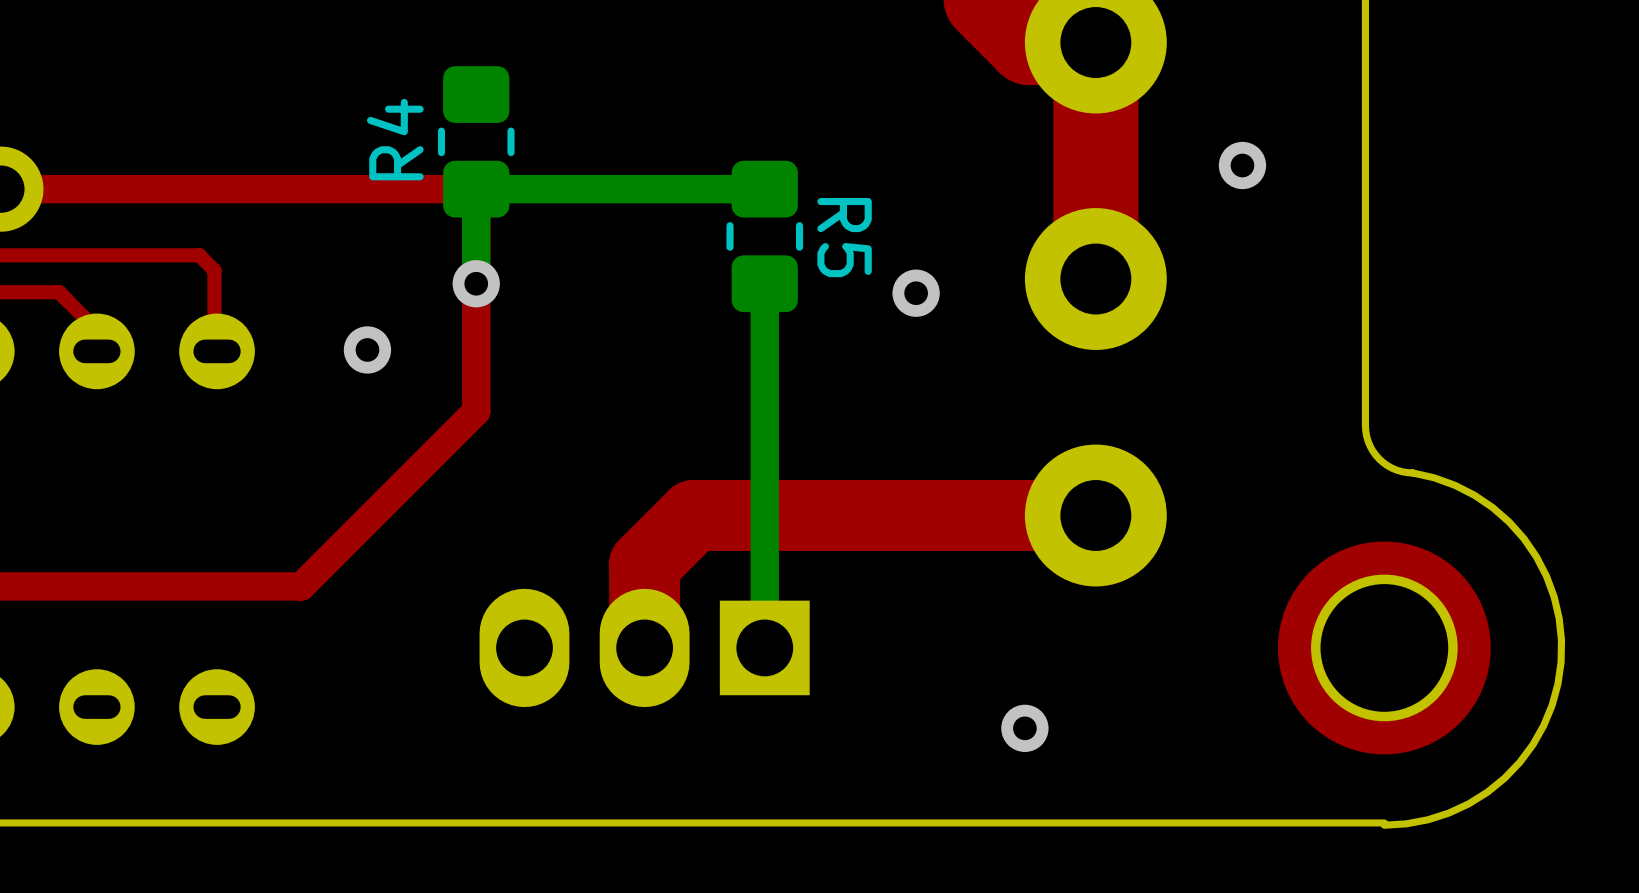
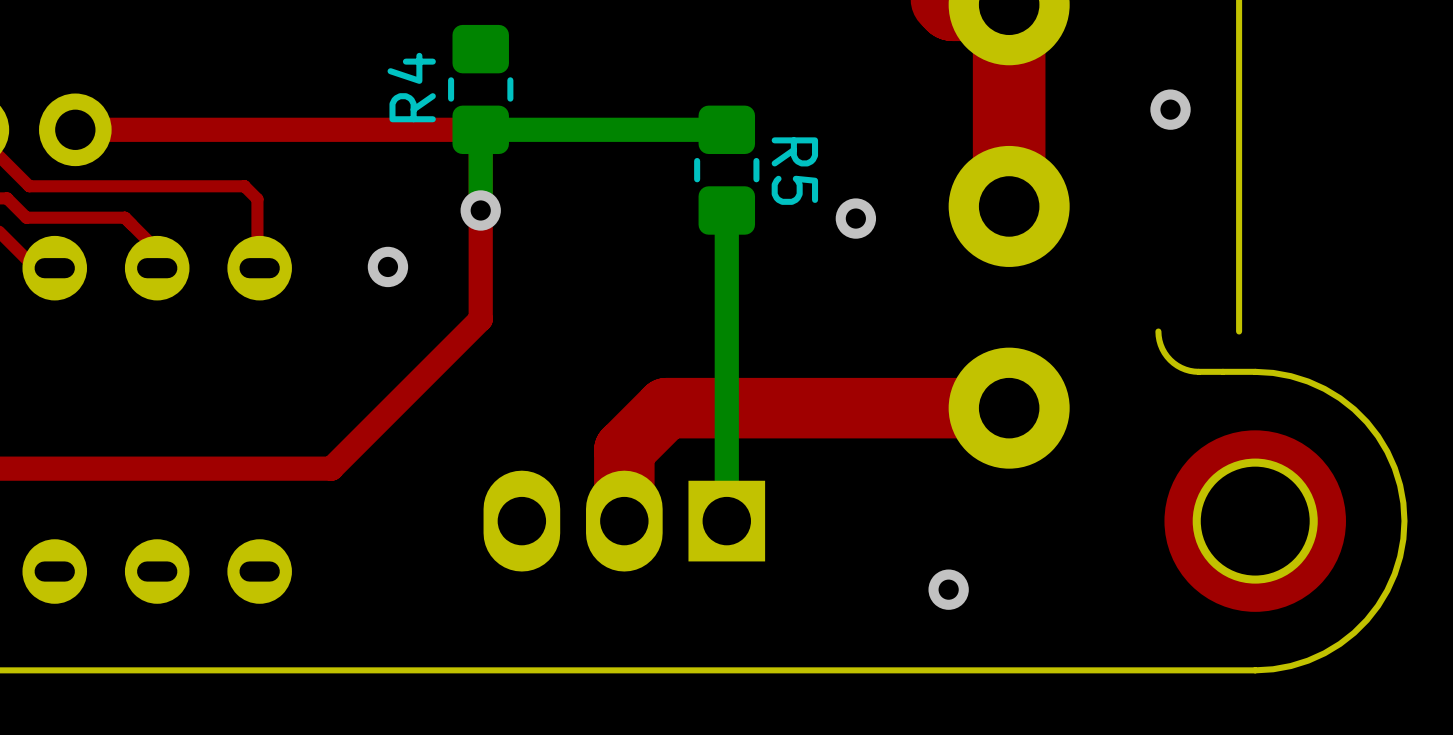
via position: (1242, 165) -> (1170, 109)
board edge: none -> (1158, 331) (1159, 340) (1164, 352) (1173, 363) (1185, 369) (1198, 371) (1273, 372) (1290, 376) (1308, 381) (1340, 398) (1354, 409) (1378, 436) (1387, 451) (1400, 485) (1404, 521) (1400, 556) (1387, 590) (1378, 605) (1354, 632) (1324, 653) (1290, 666) (1255, 670)
board edge: (1365, 425) (1366, 436) (1372, 450) (1387, 465) (1397, 470) (1434, 477) (1454, 485) (1492, 507) (1509, 522) (1523, 538) (1546, 576) (1559, 618) (1561, 640) (1557, 683) (1552, 705) (1532, 744) (1504, 778) (1487, 792) (1448, 813) (1406, 823) (1384, 825) -> none

